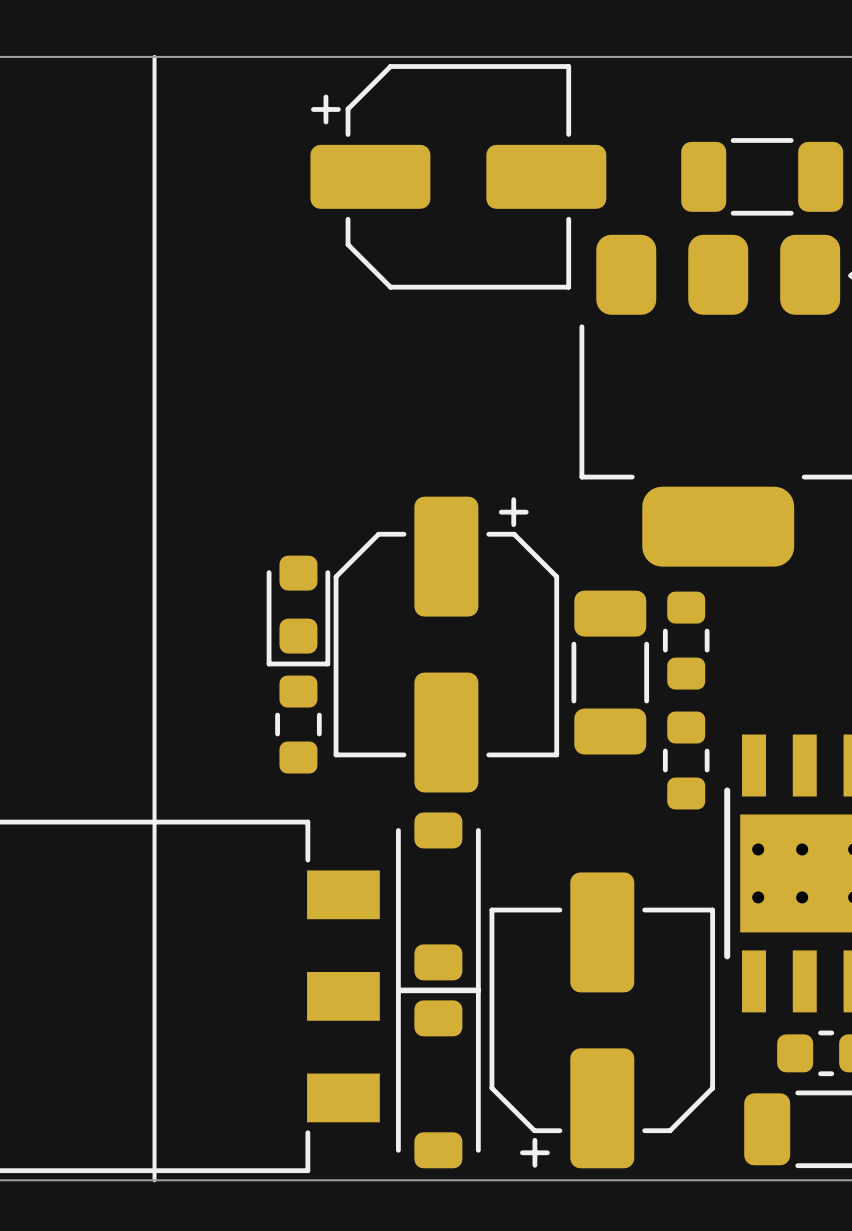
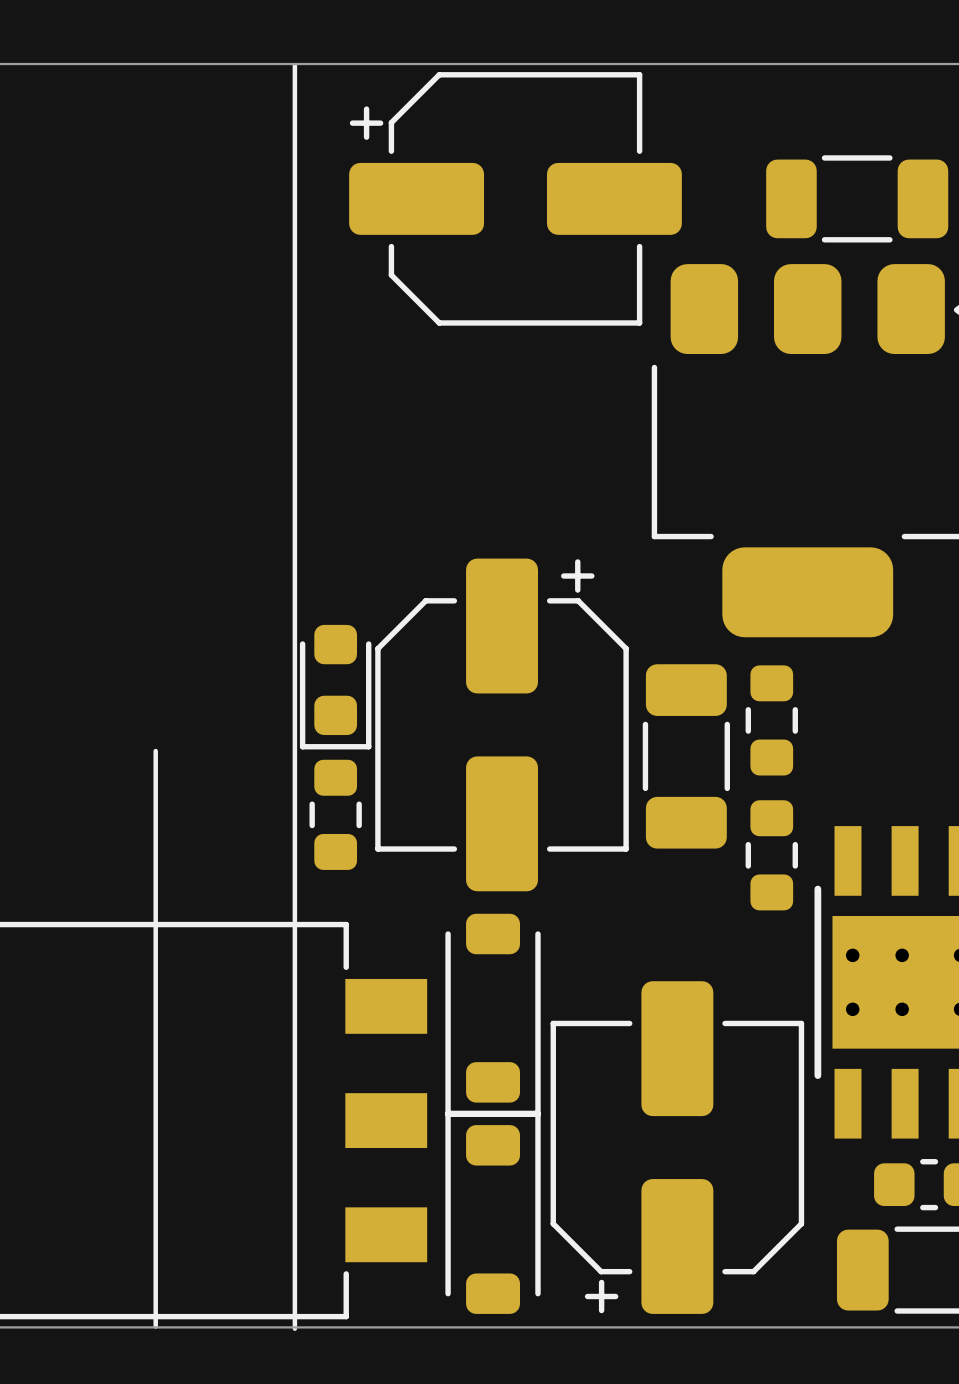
line: (154, 56) (154, 1180) -> (294, 65) (294, 1328)
line: none -> (155, 751) (155, 1326)

